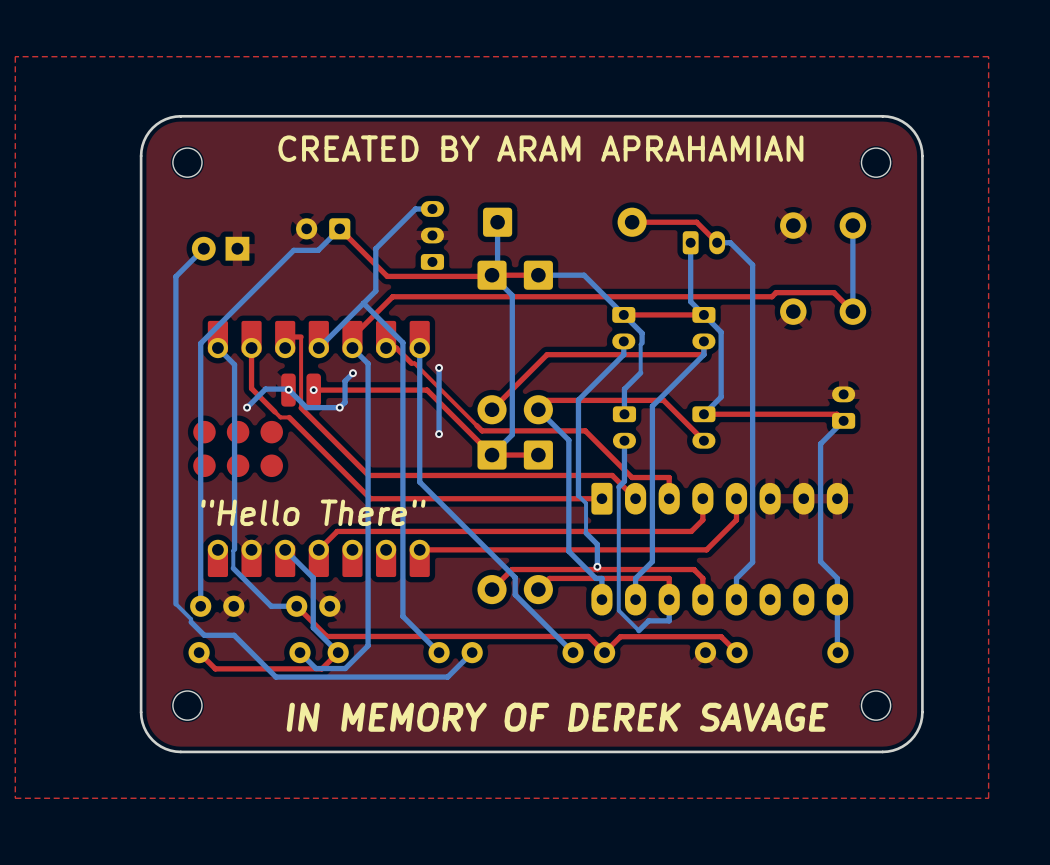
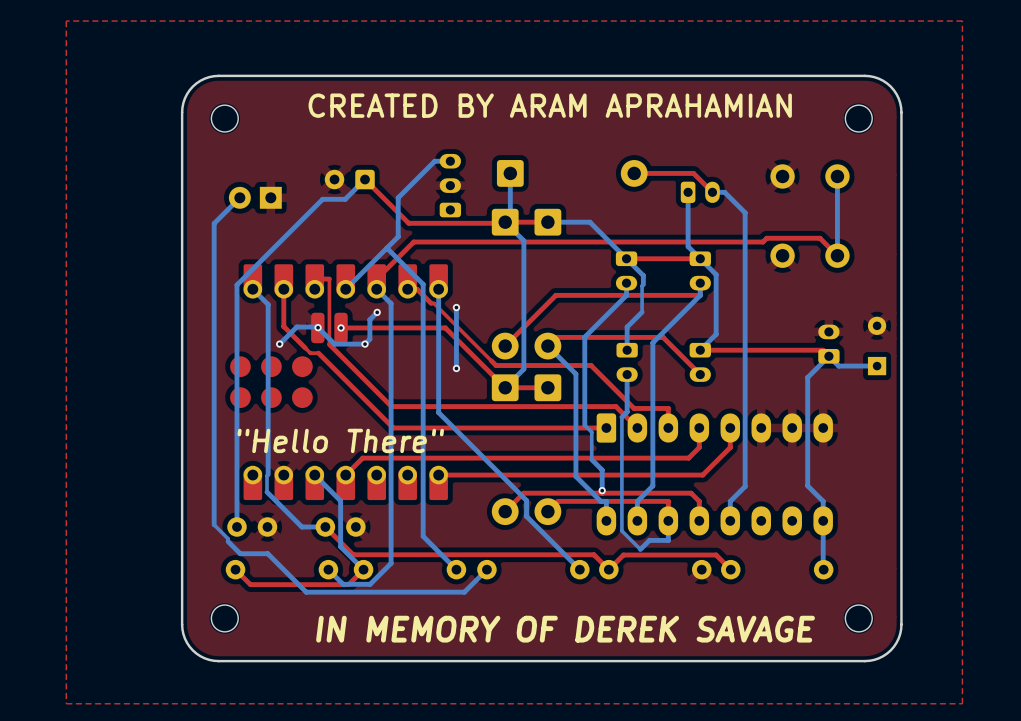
part: none -> (877, 325)
bottom track: none -> (828, 356) (838, 366) (877, 366)
part: none -> (877, 366)

